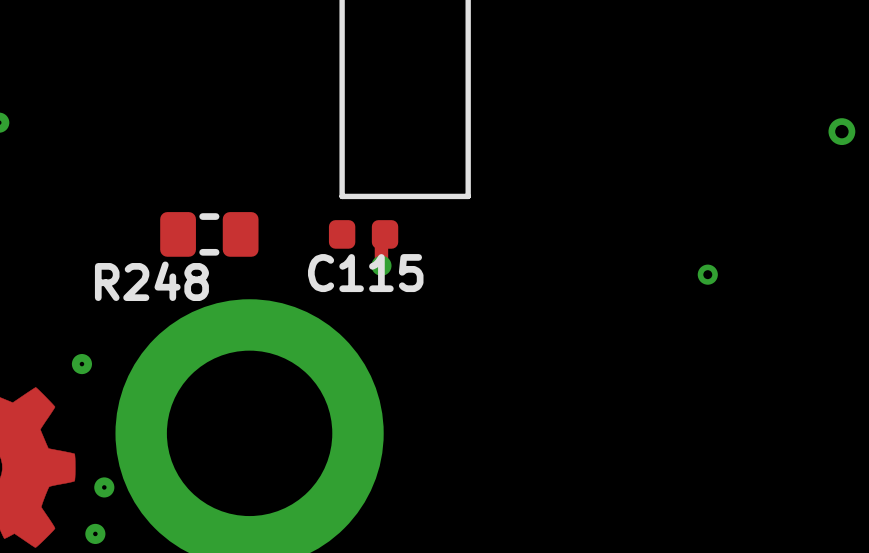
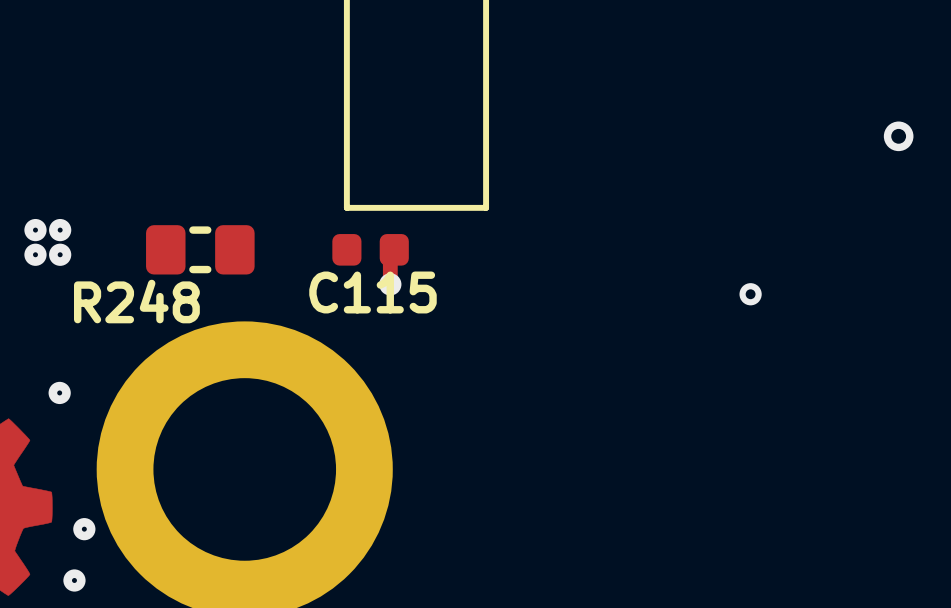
via: none -> (35, 230)
via: none -> (60, 230)
via: none -> (35, 254)
via: none -> (60, 254)

